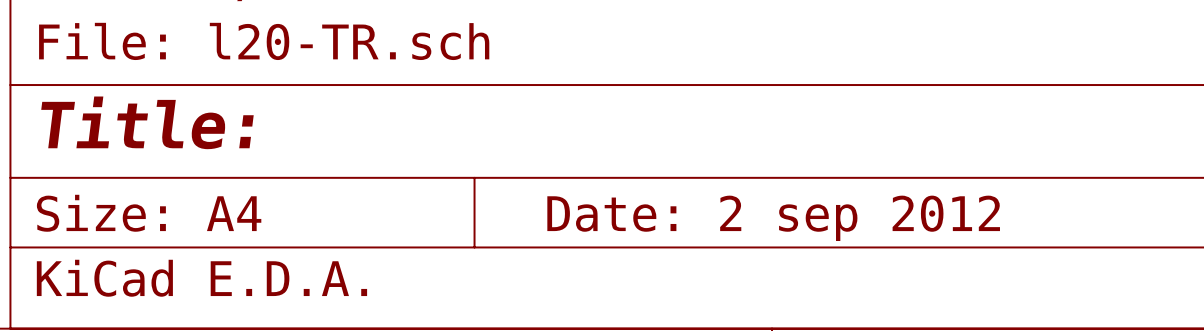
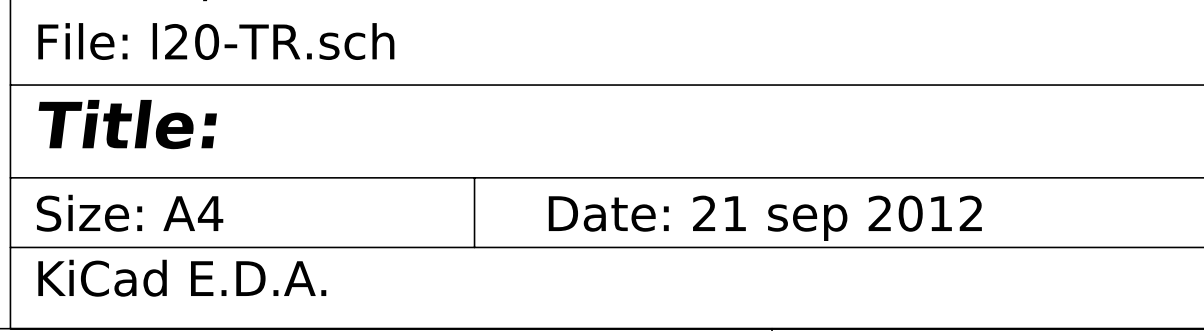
title block: Date: 2 sep 2012 (773, 218) -> Date: 21 sep 2012 (765, 218)

